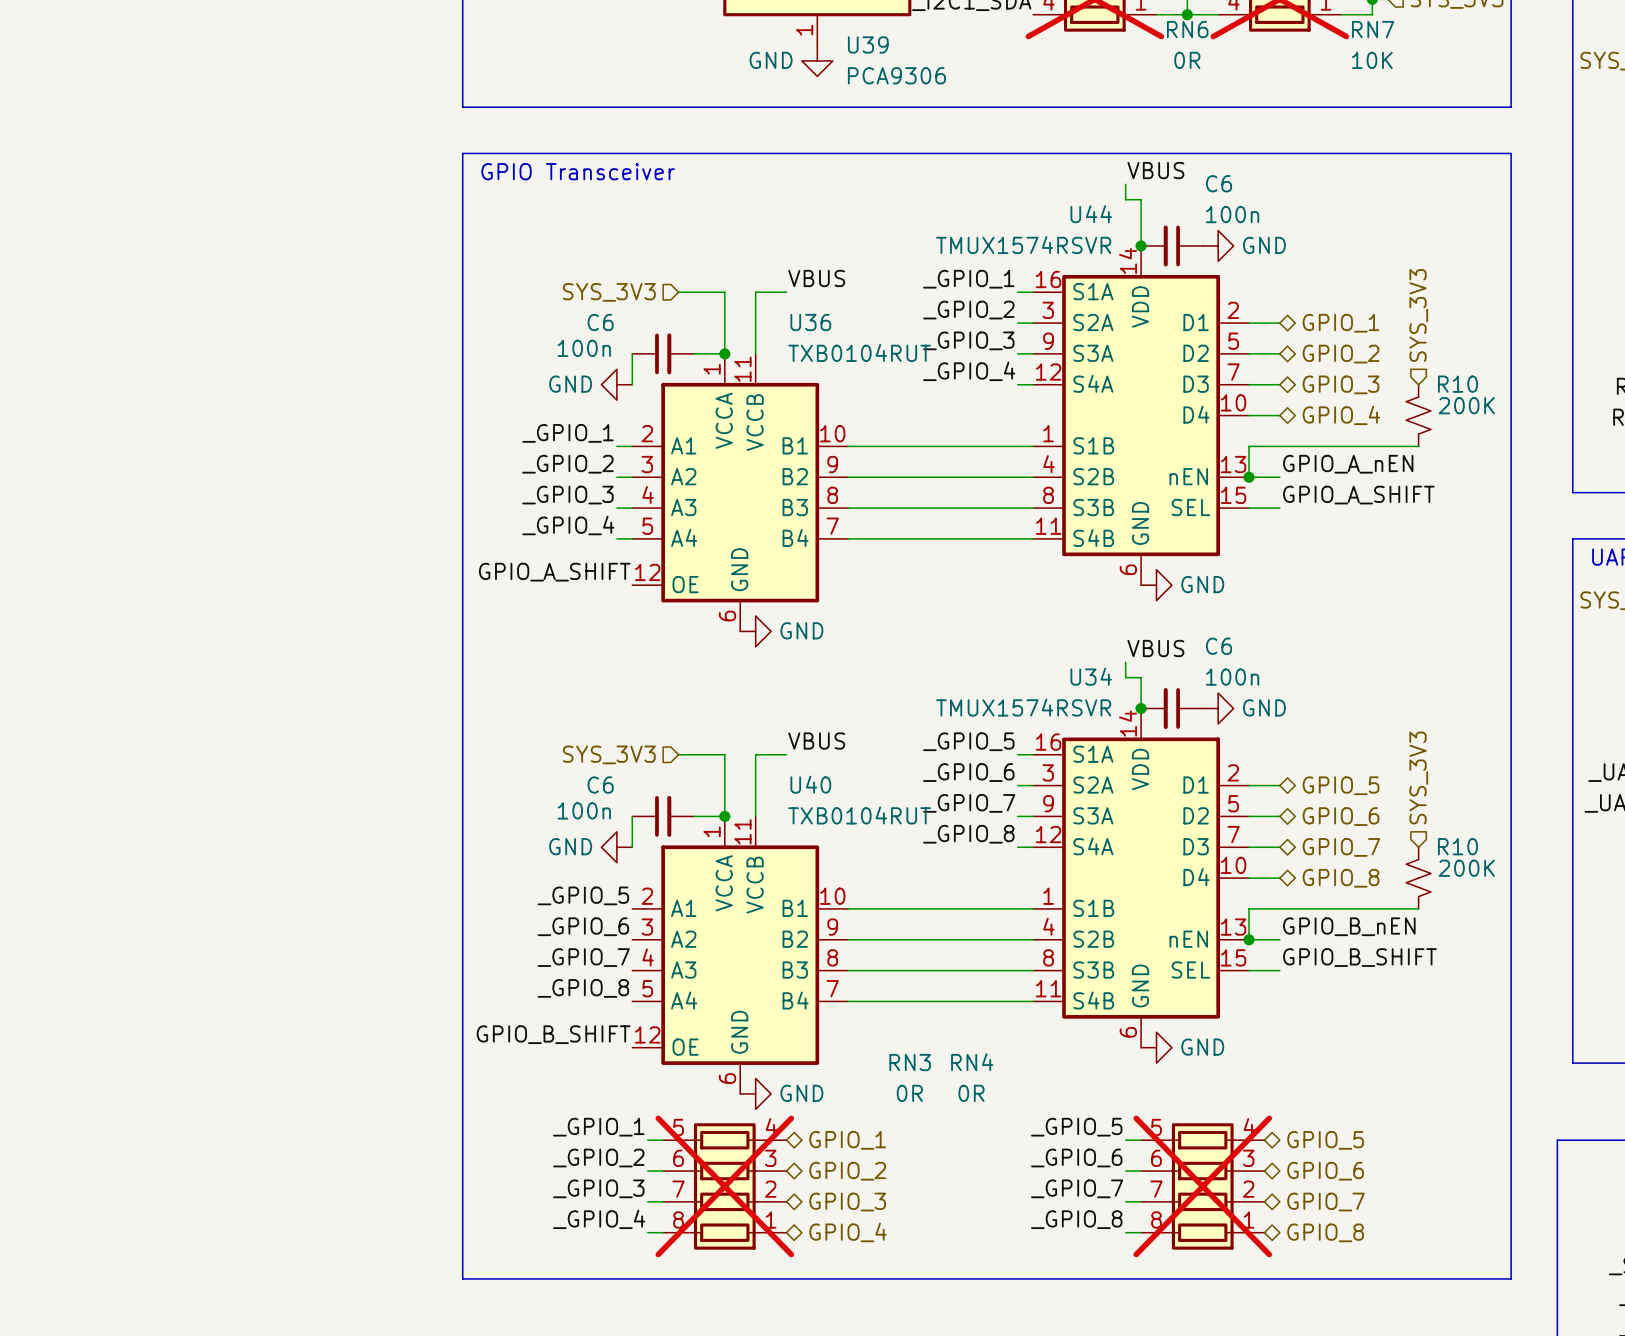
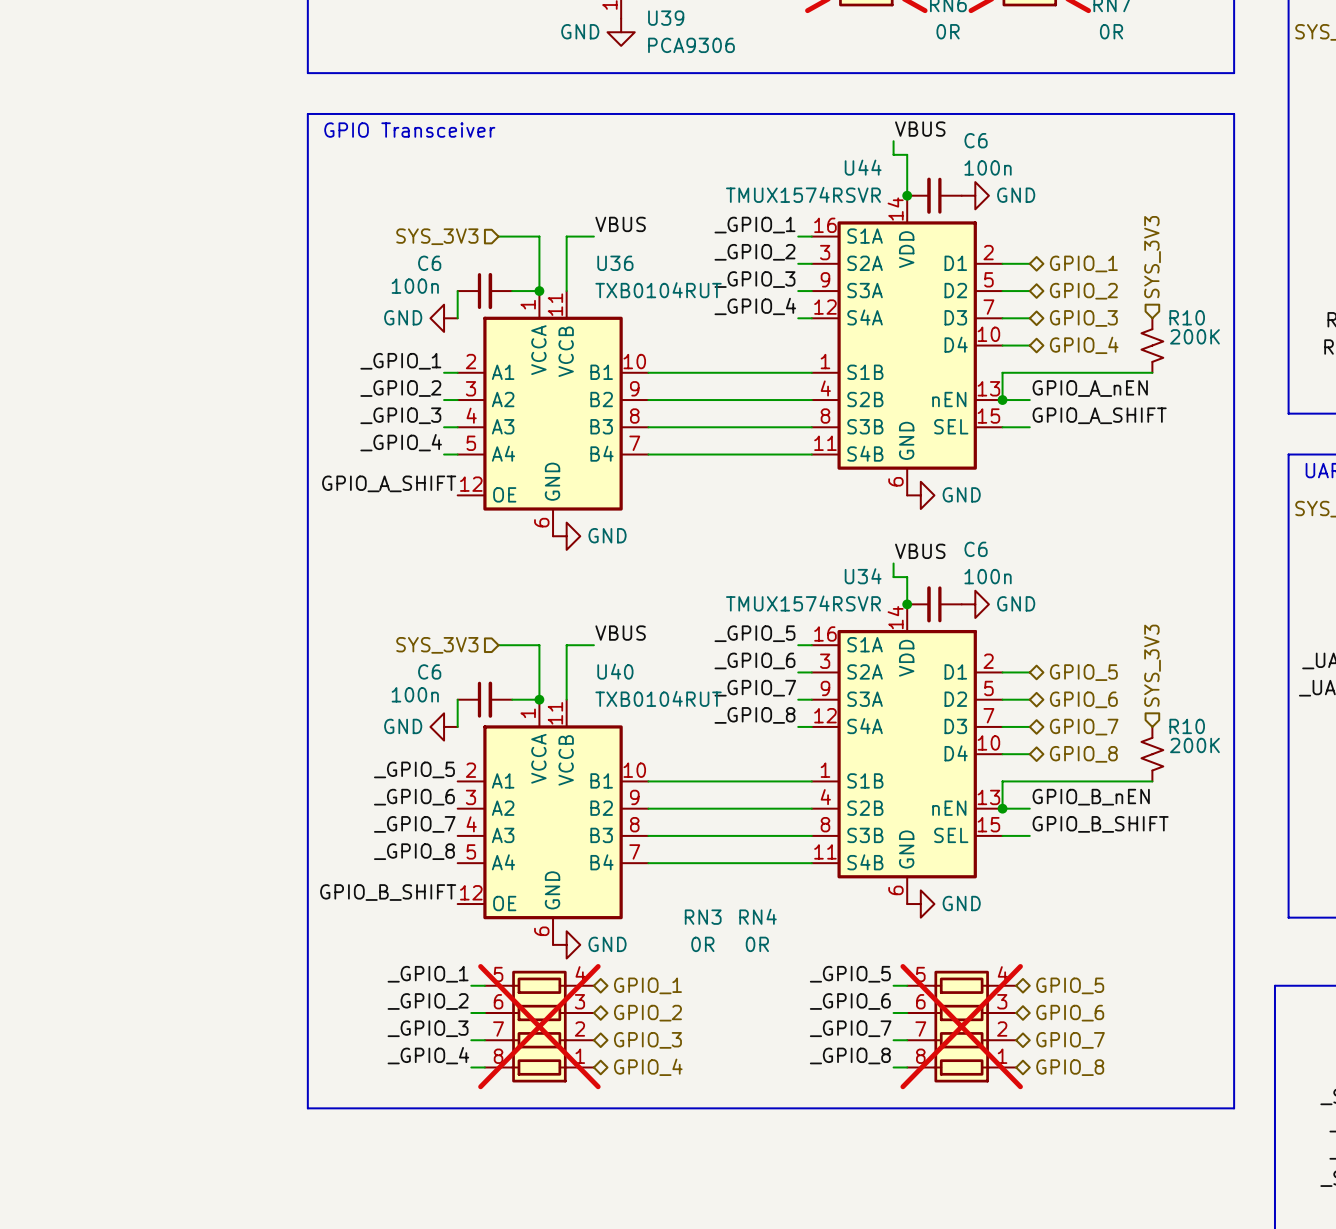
RN7 value: 10K (1372, 60) -> 0R (1111, 31)

